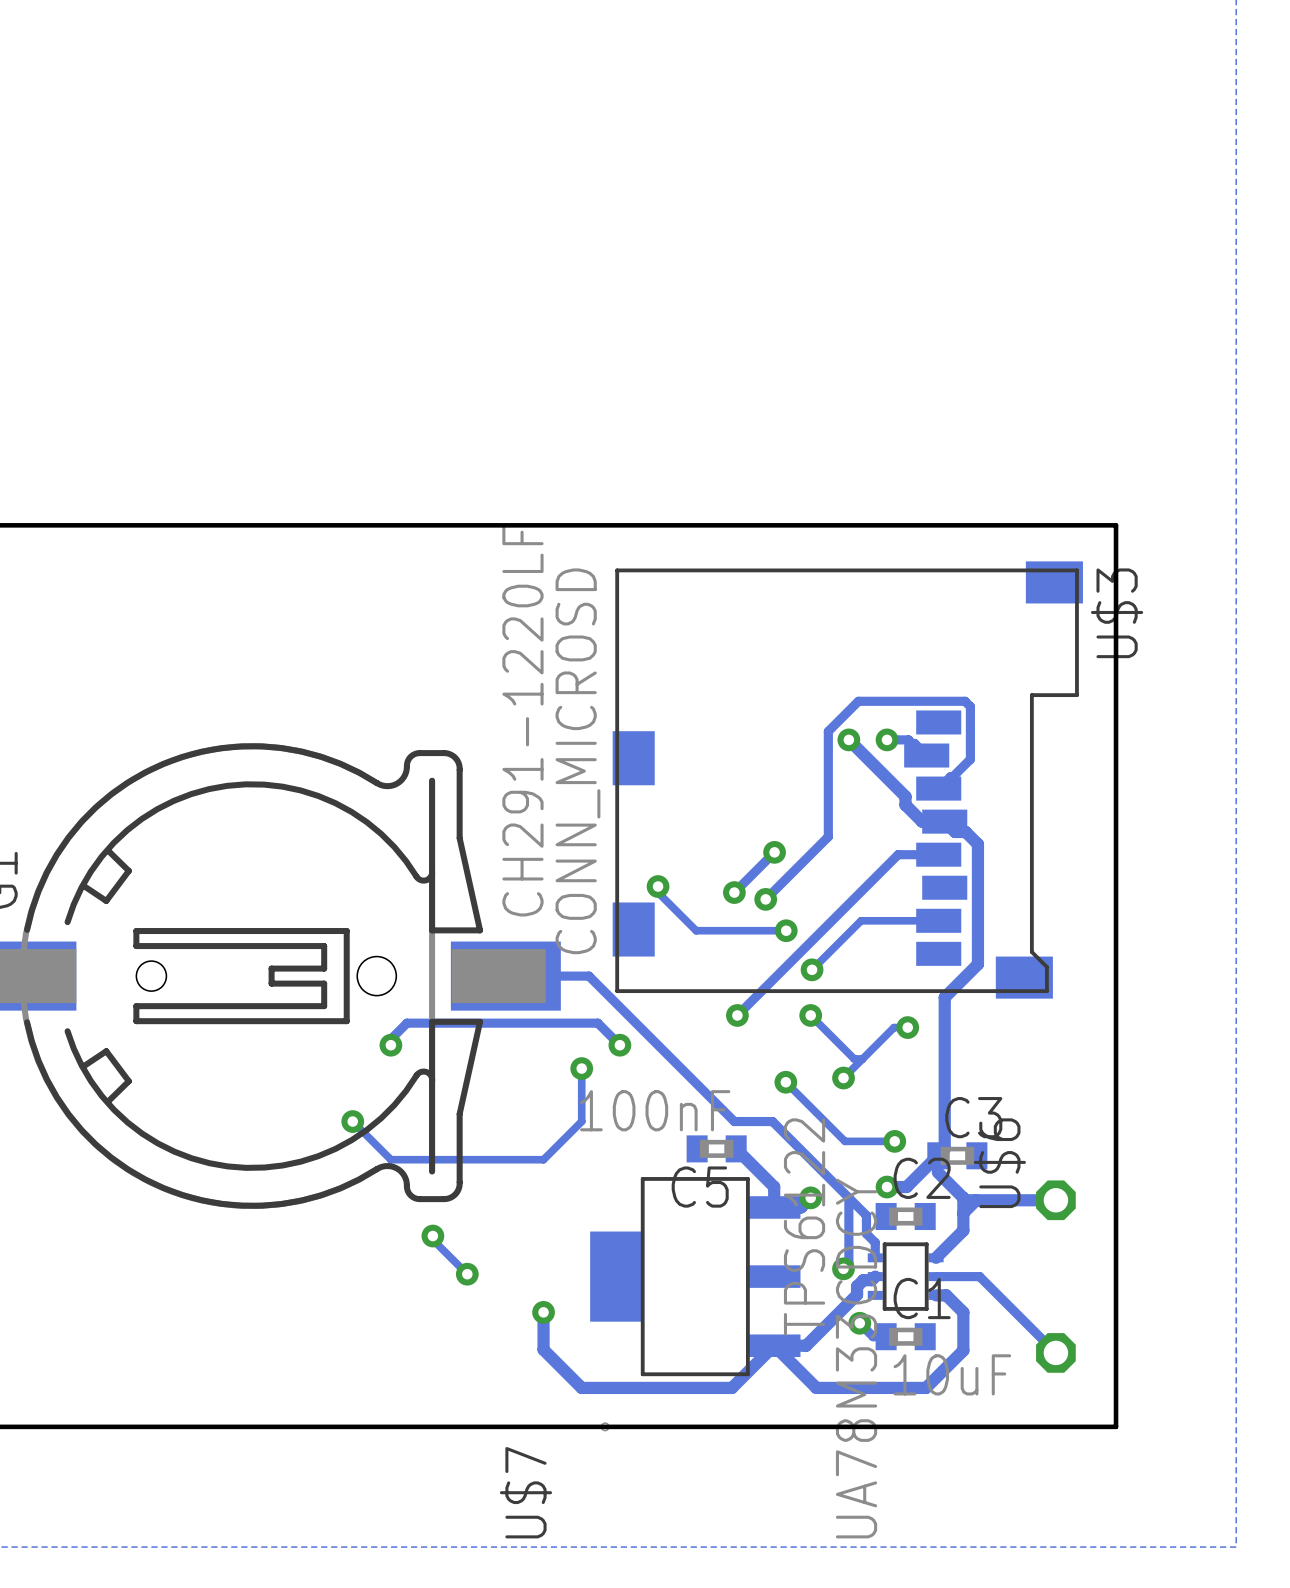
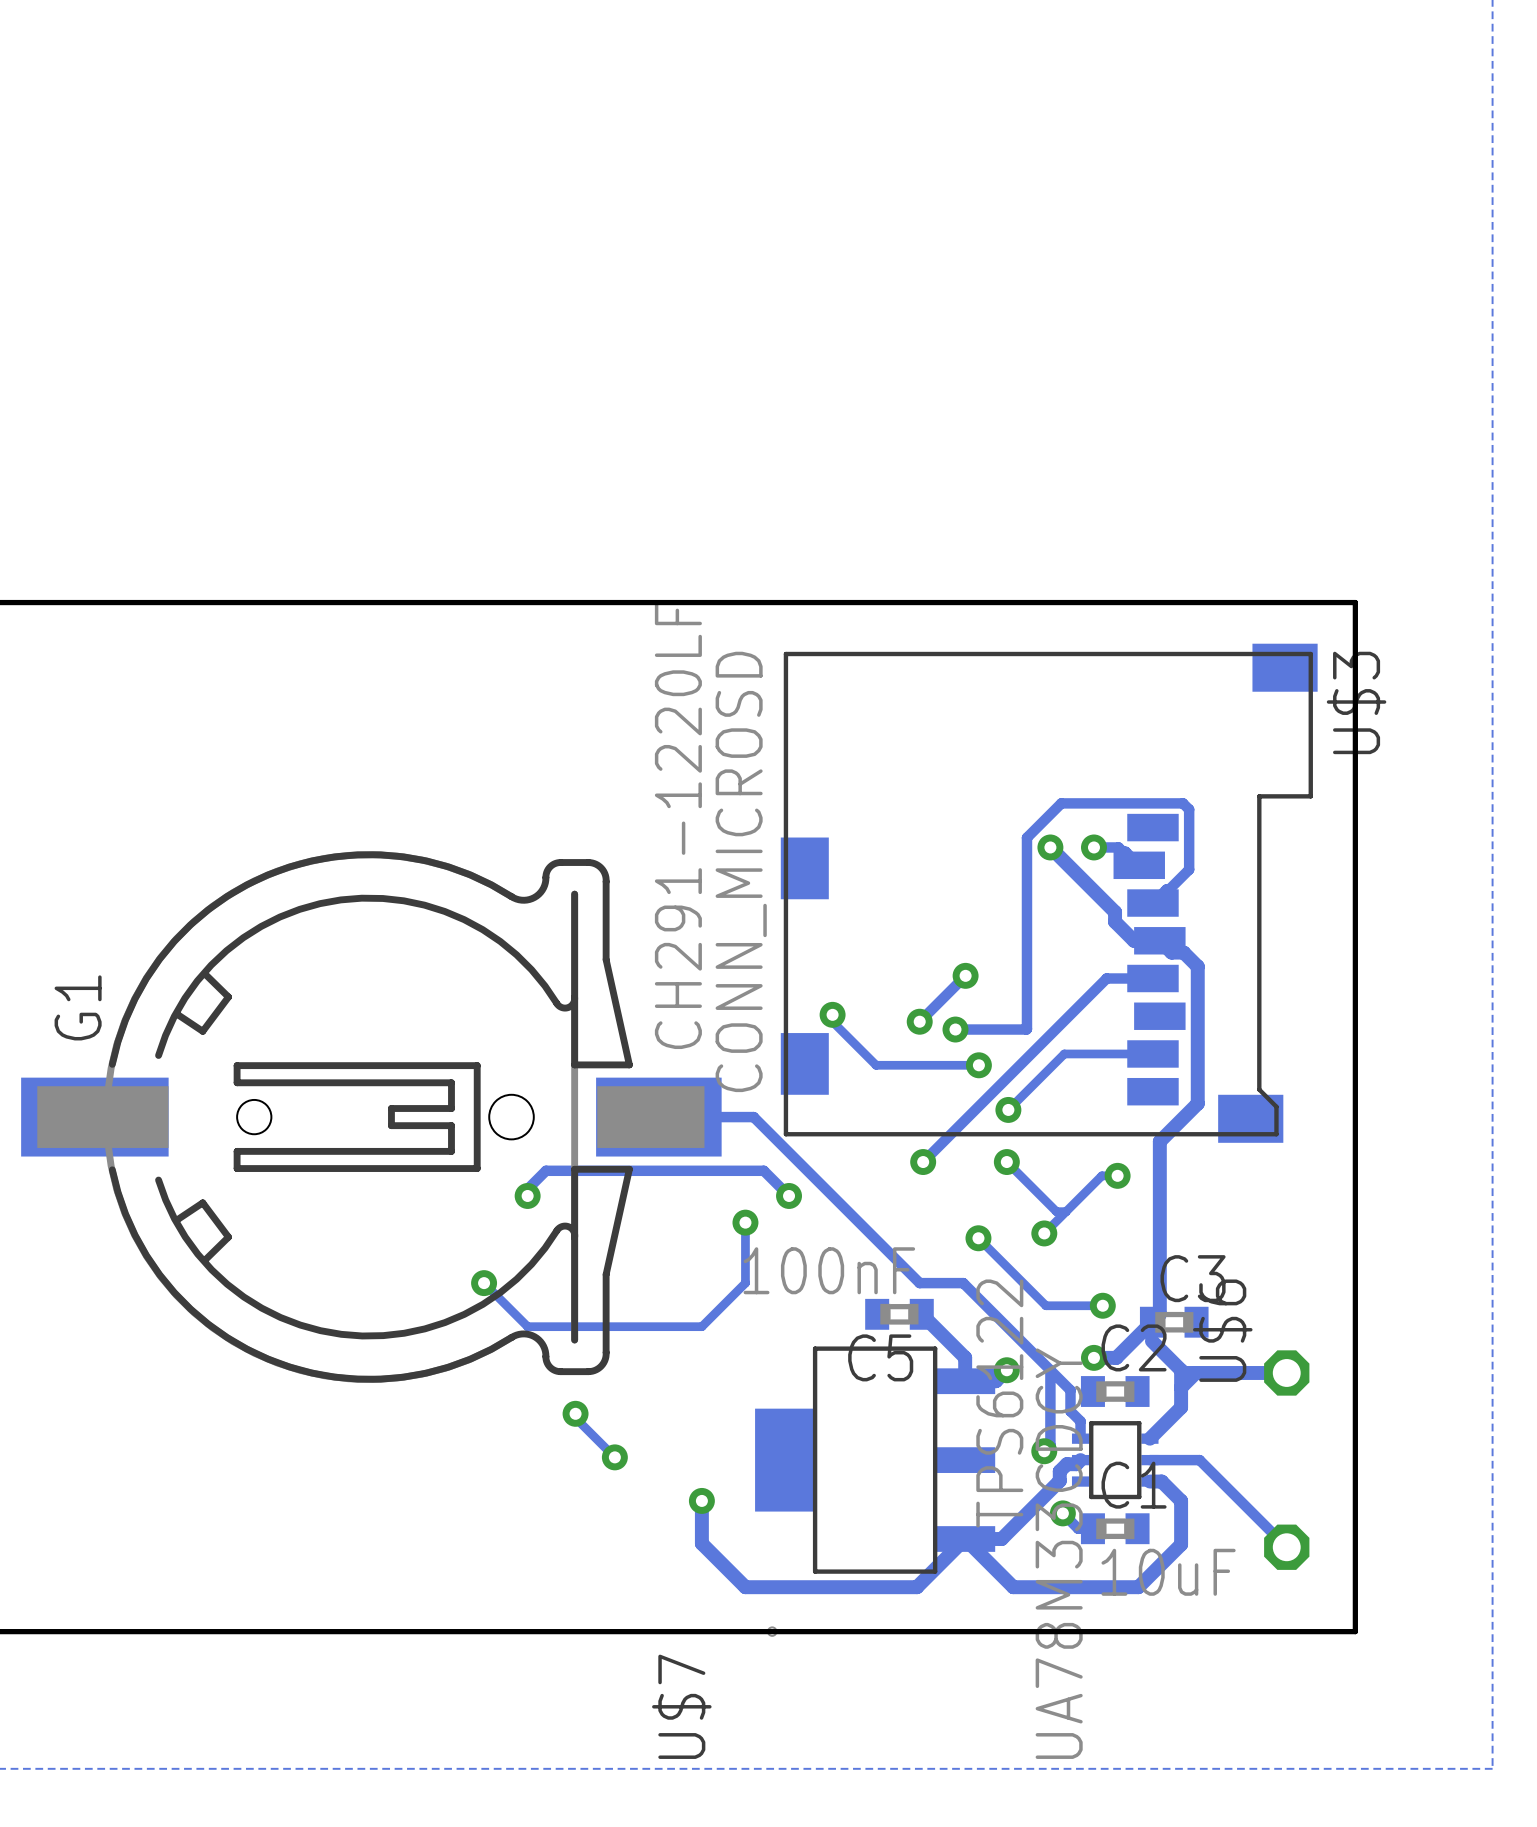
track: (828, 836) (765, 899) -> (1026, 958) (1026, 1029) (955, 1029)

